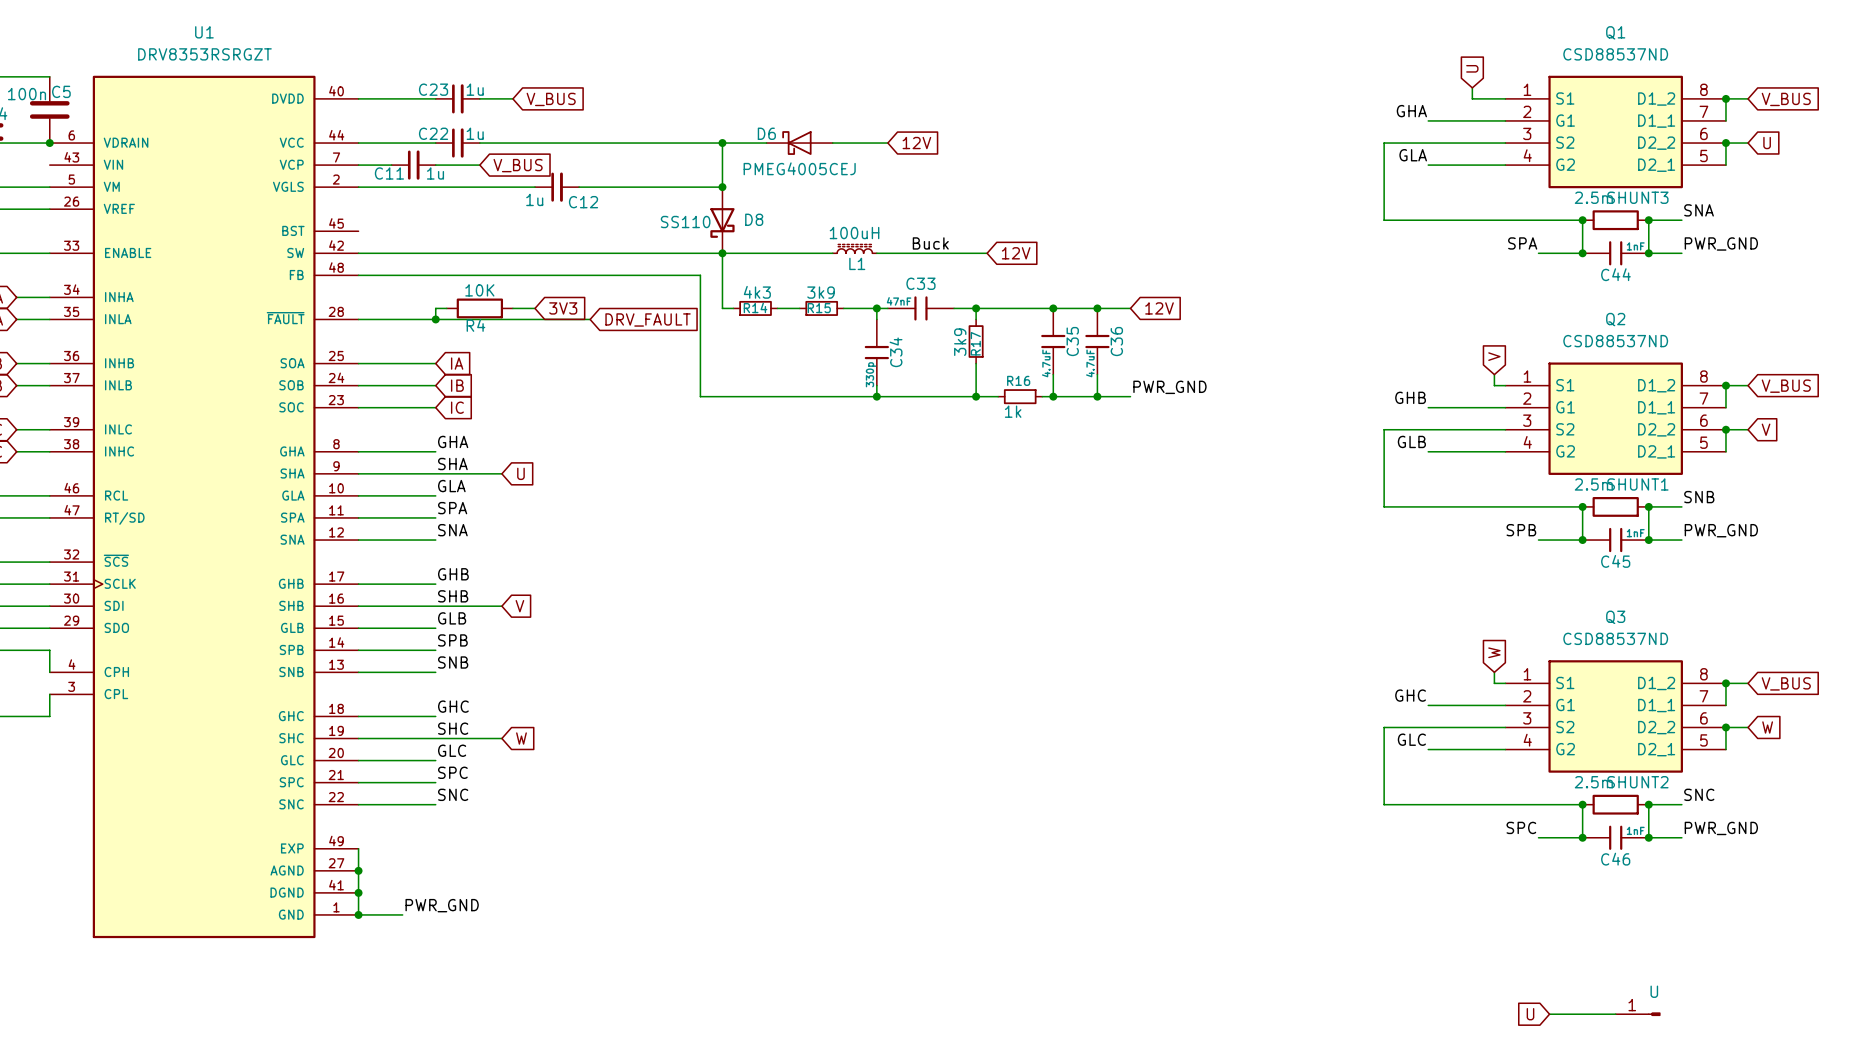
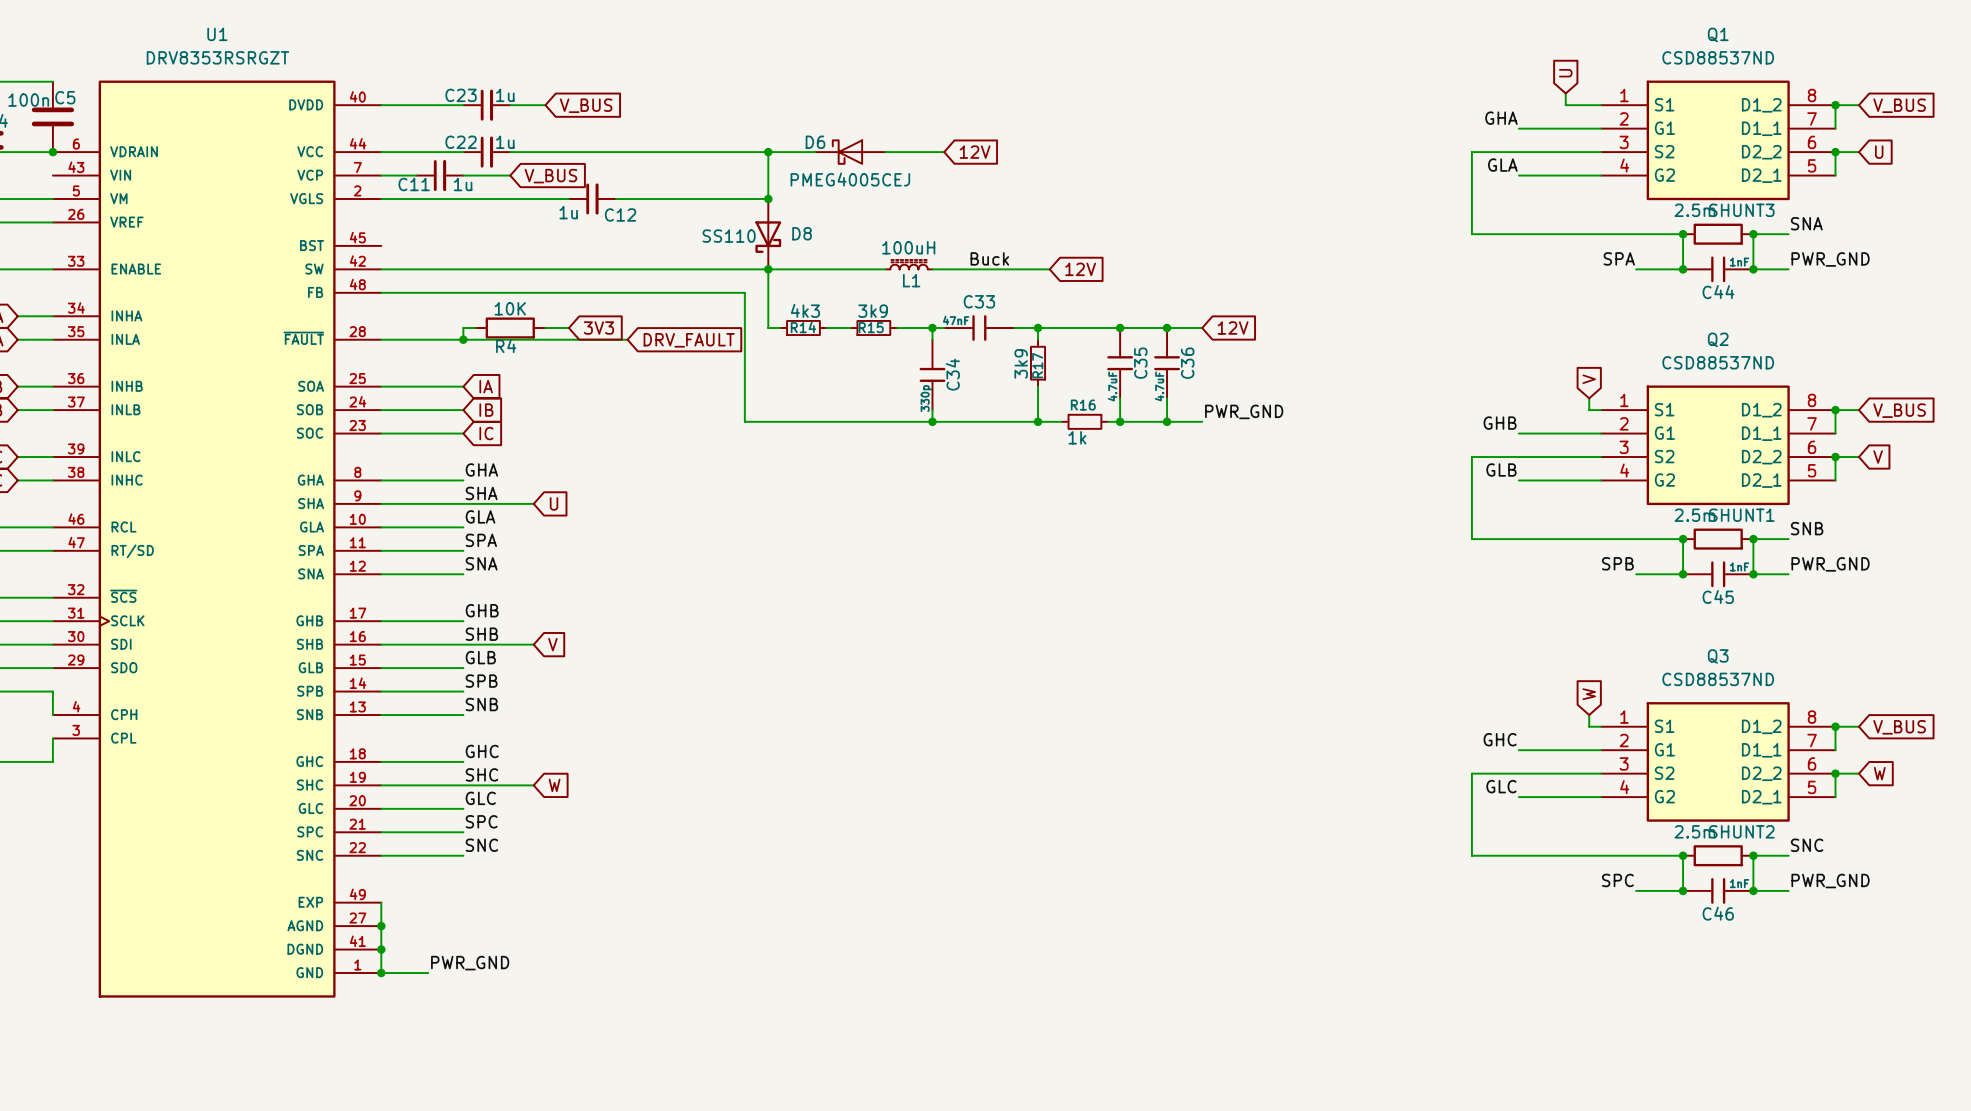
global label: U (1530, 1014) -> none
wire: (1549, 1014) (1615, 1014) -> none
part: U (1638, 1014) -> none

